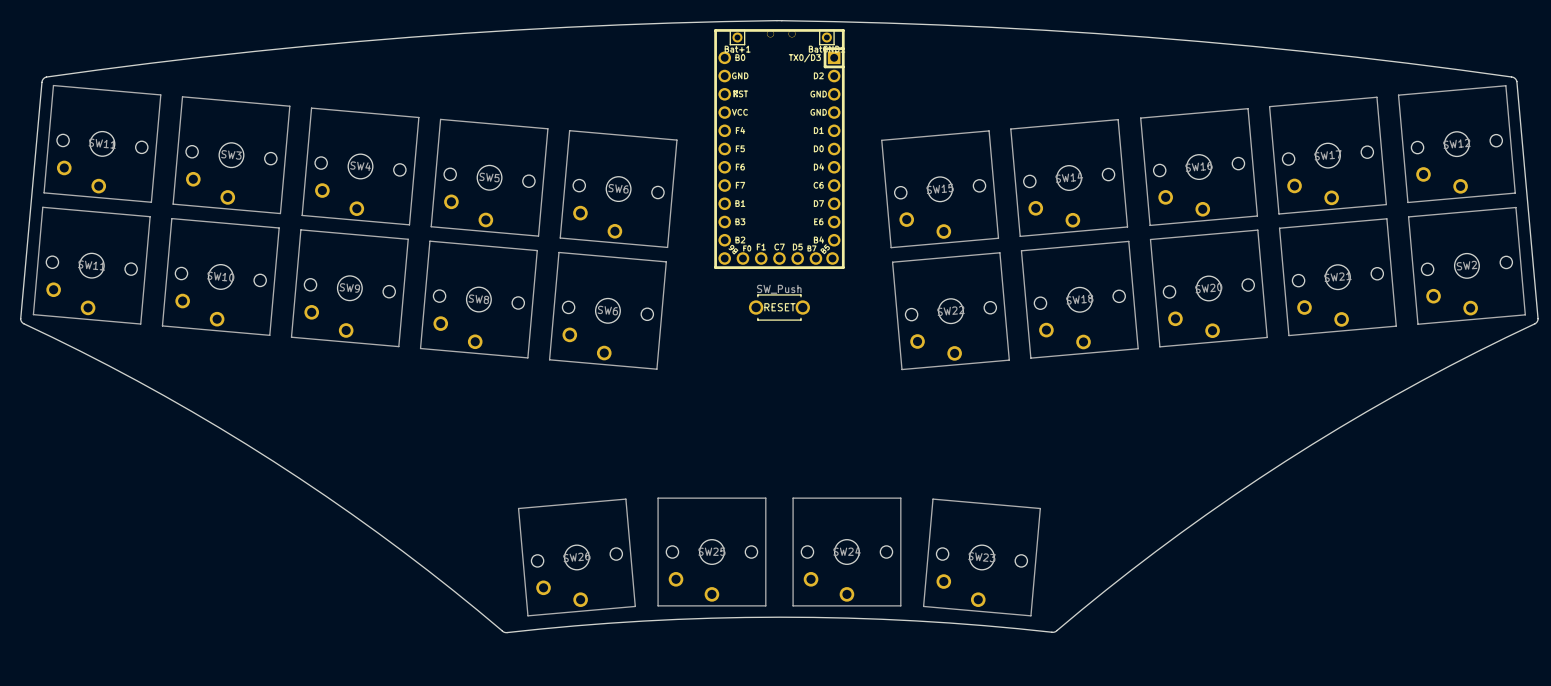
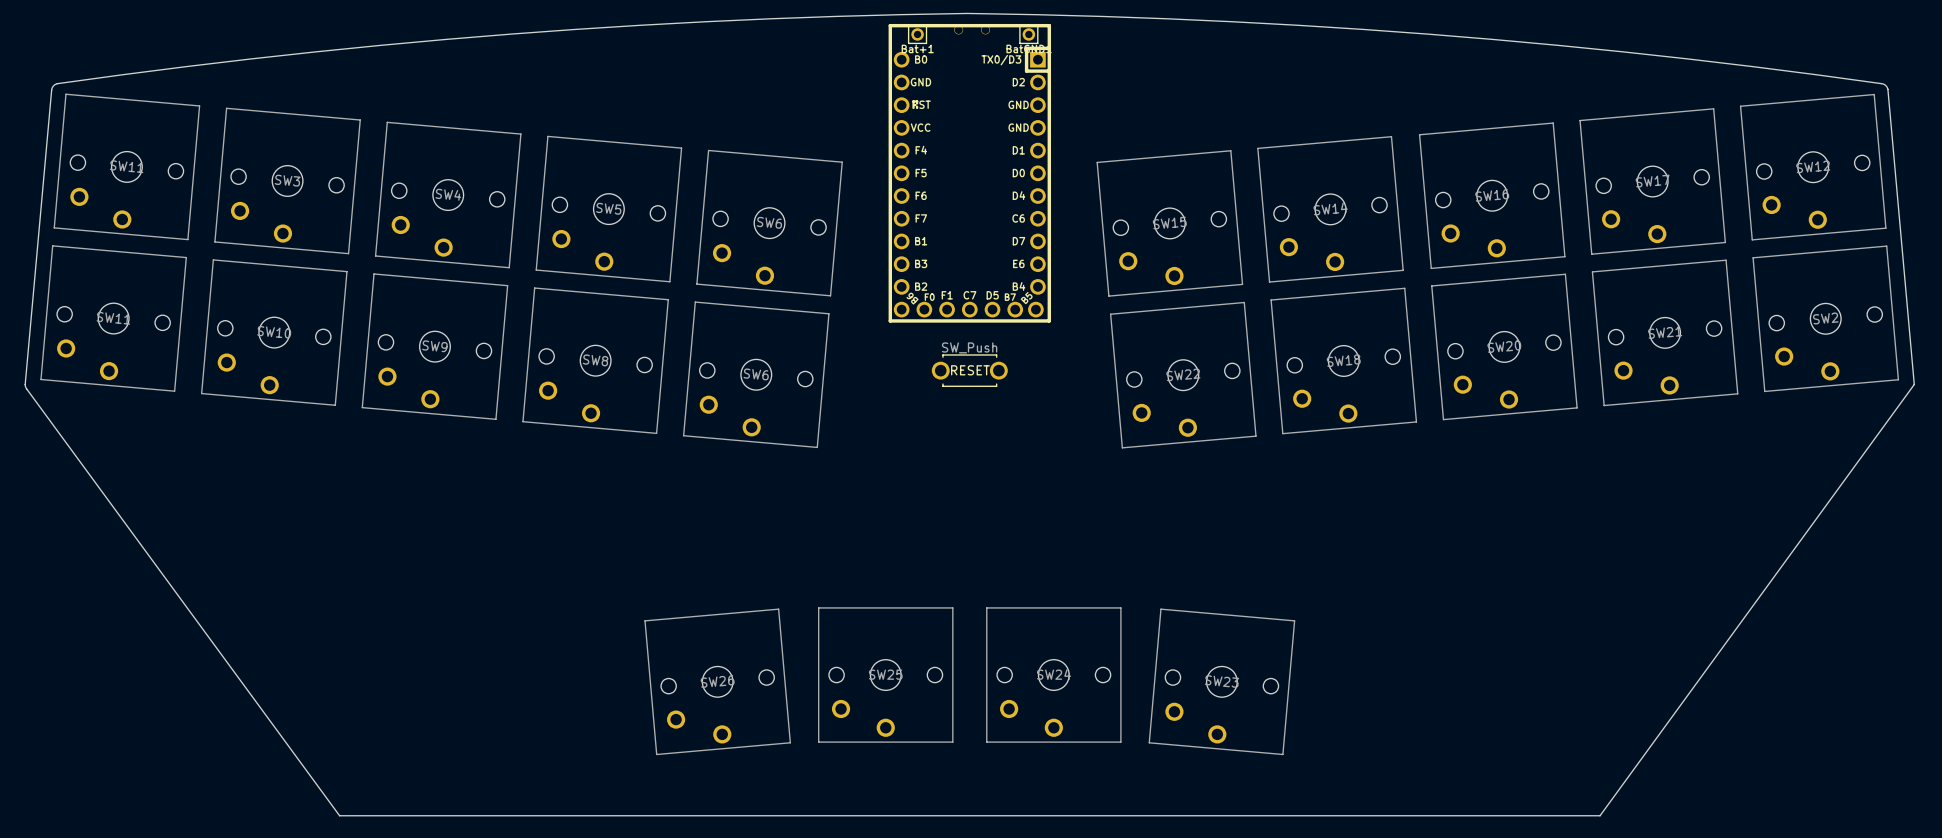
board edge: (20, 318) (23, 323) (164, 395) (273, 461) (377, 532) (502, 630) -> none
board edge: (1538, 318) (1535, 323) (1394, 395) (1285, 461) (1181, 532) (1054, 631) (915, 620) (779, 617) (677, 619) (506, 632) (502, 630) -> (1914, 384) (1600, 815) (339, 815) (25, 384)

